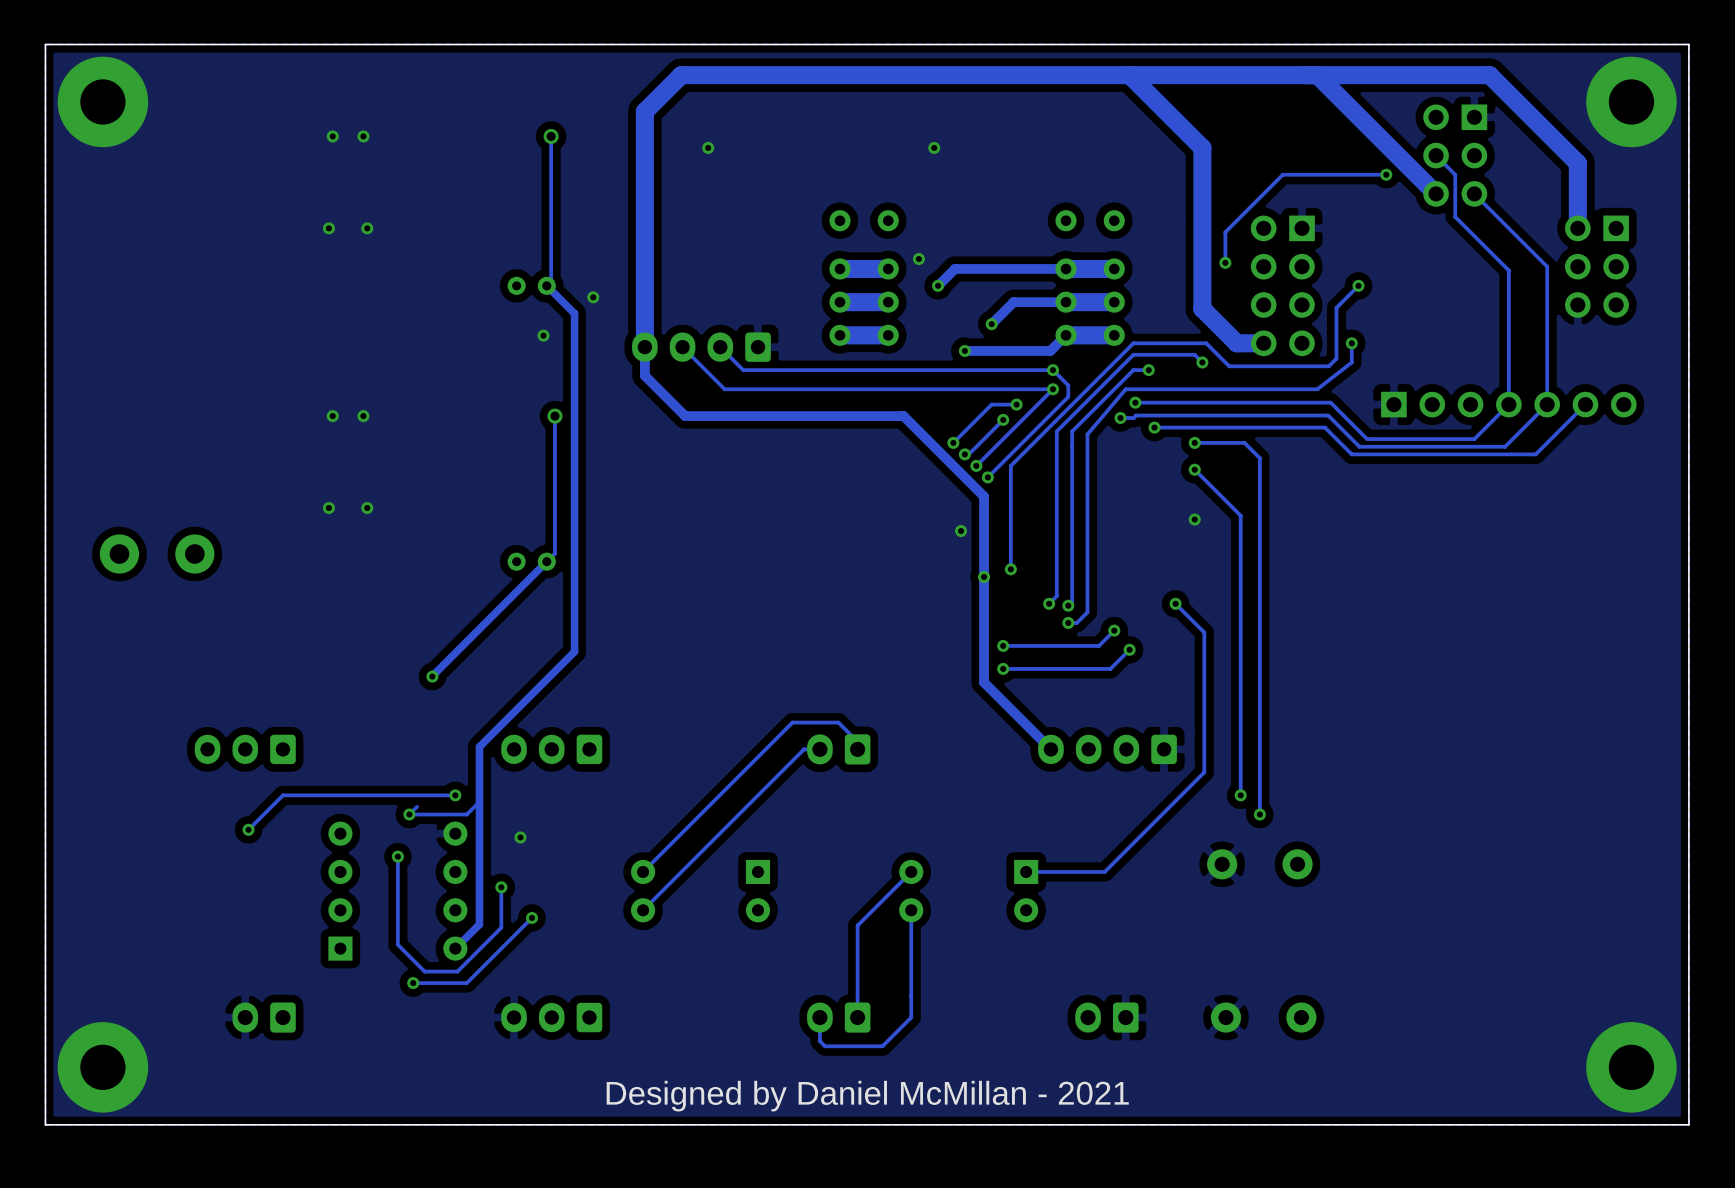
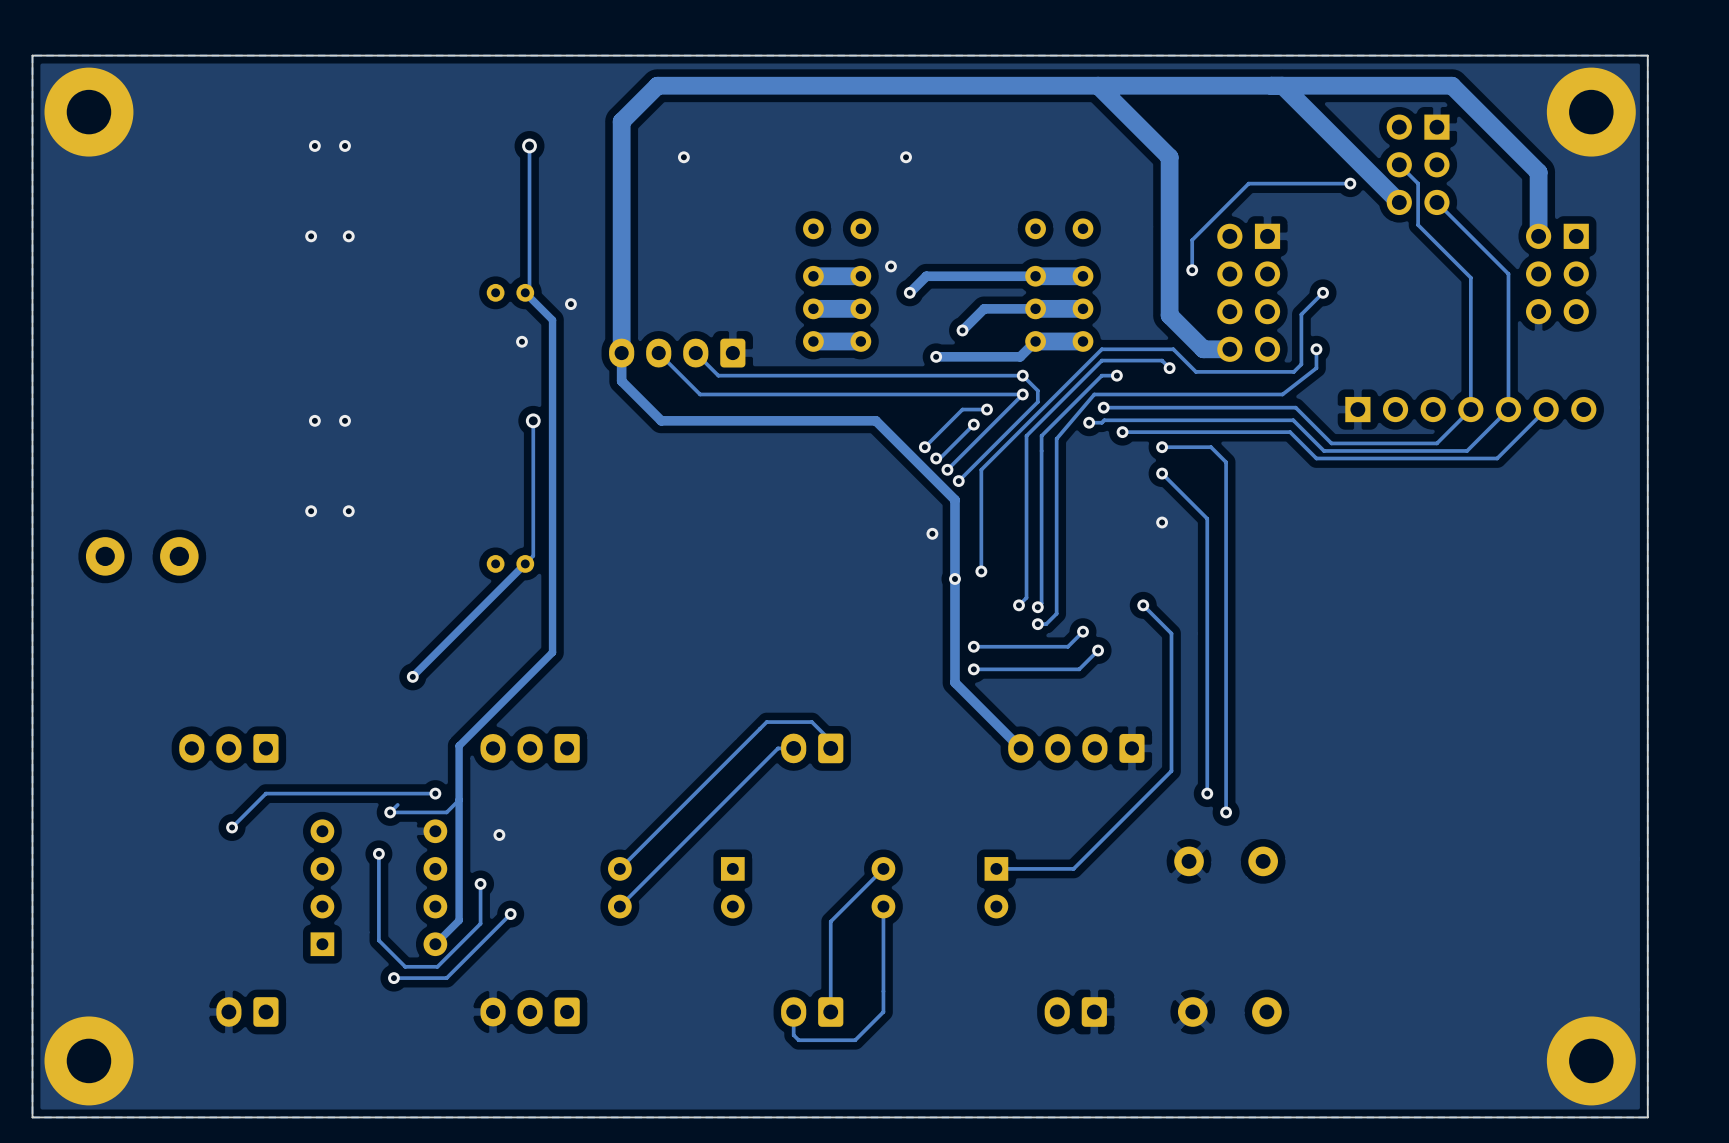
text: Designed by Daniel McMillan - 2021 (867, 1096) -> none

